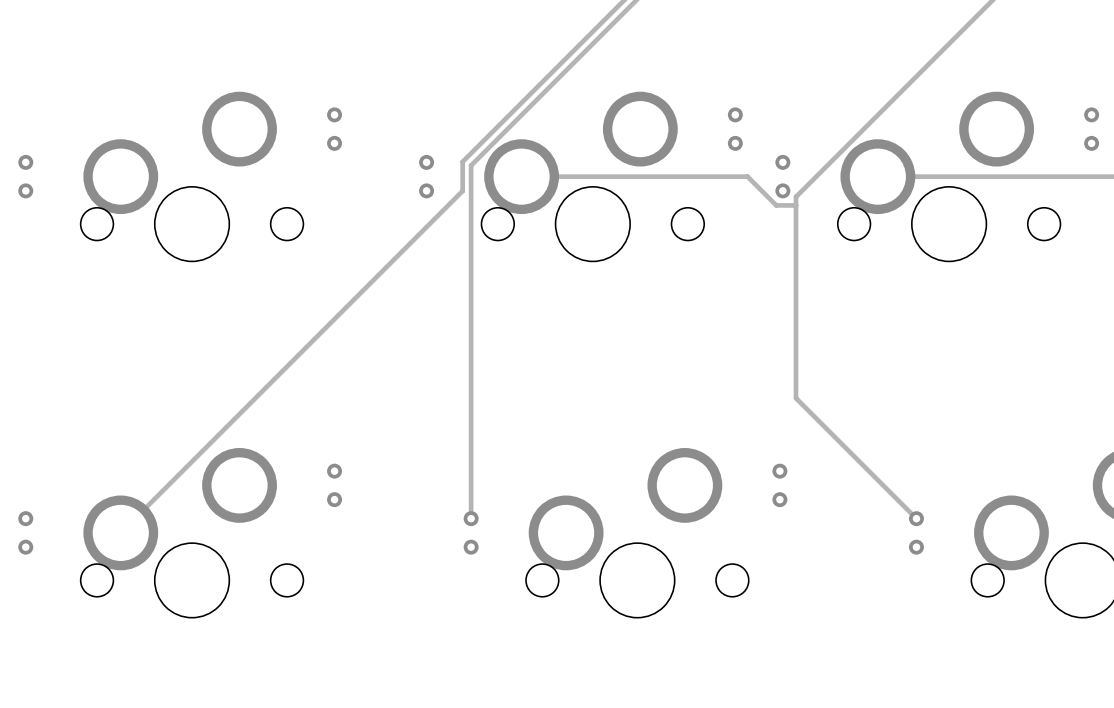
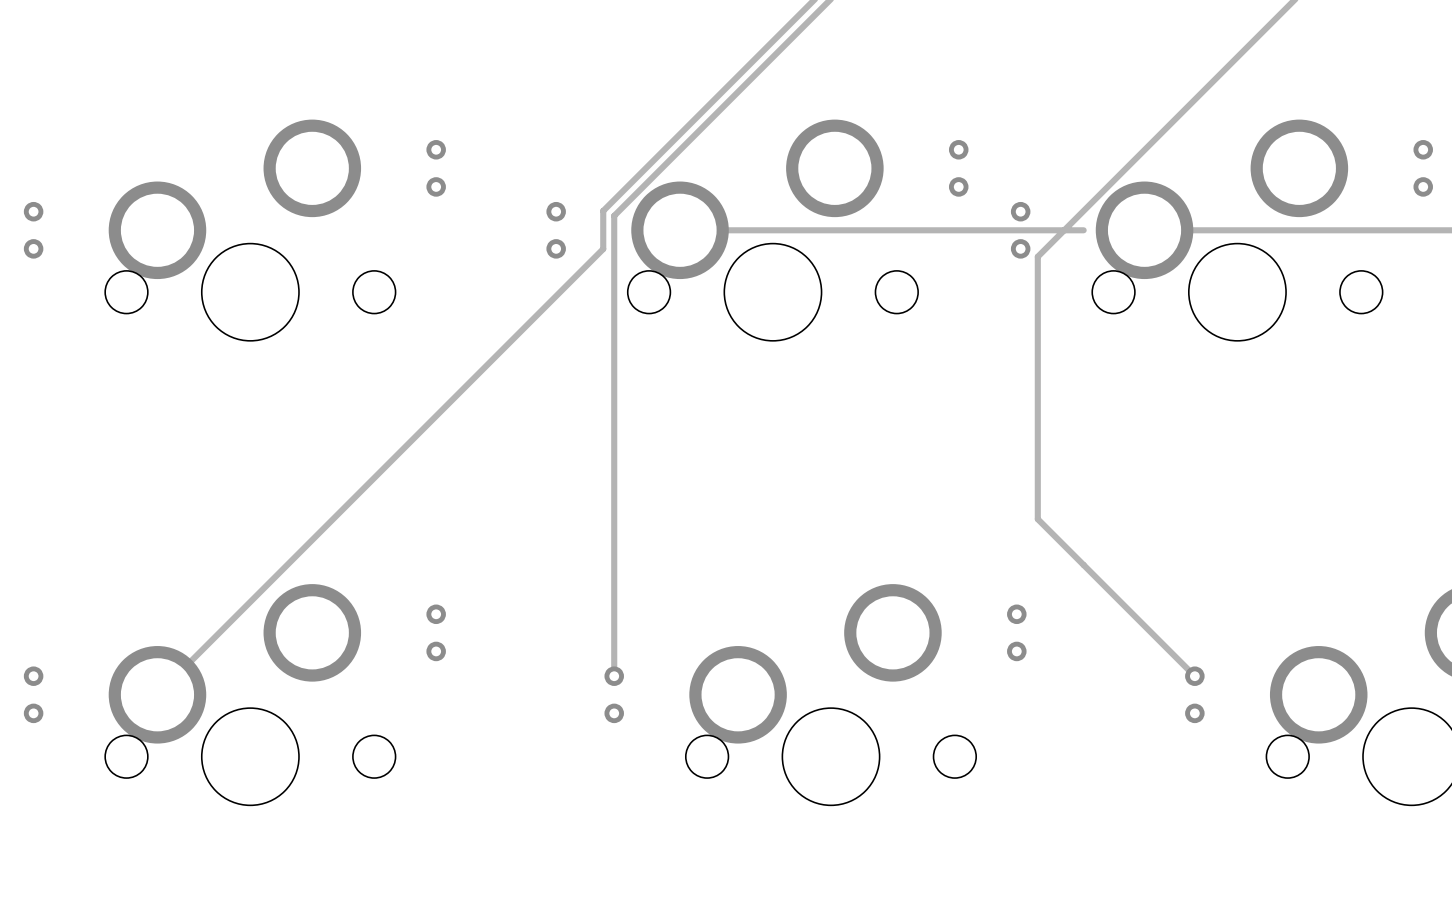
track: (747, 176) (776, 205) (796, 205) -> (974, 230) (1083, 230)

